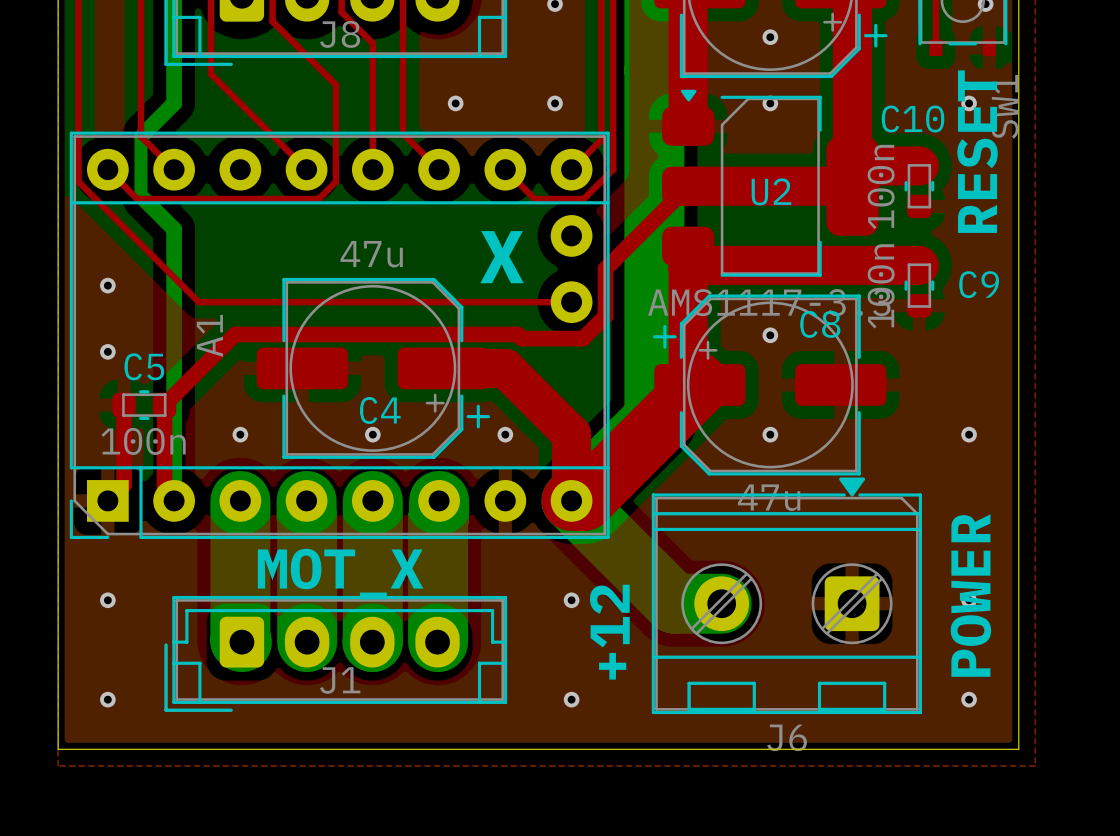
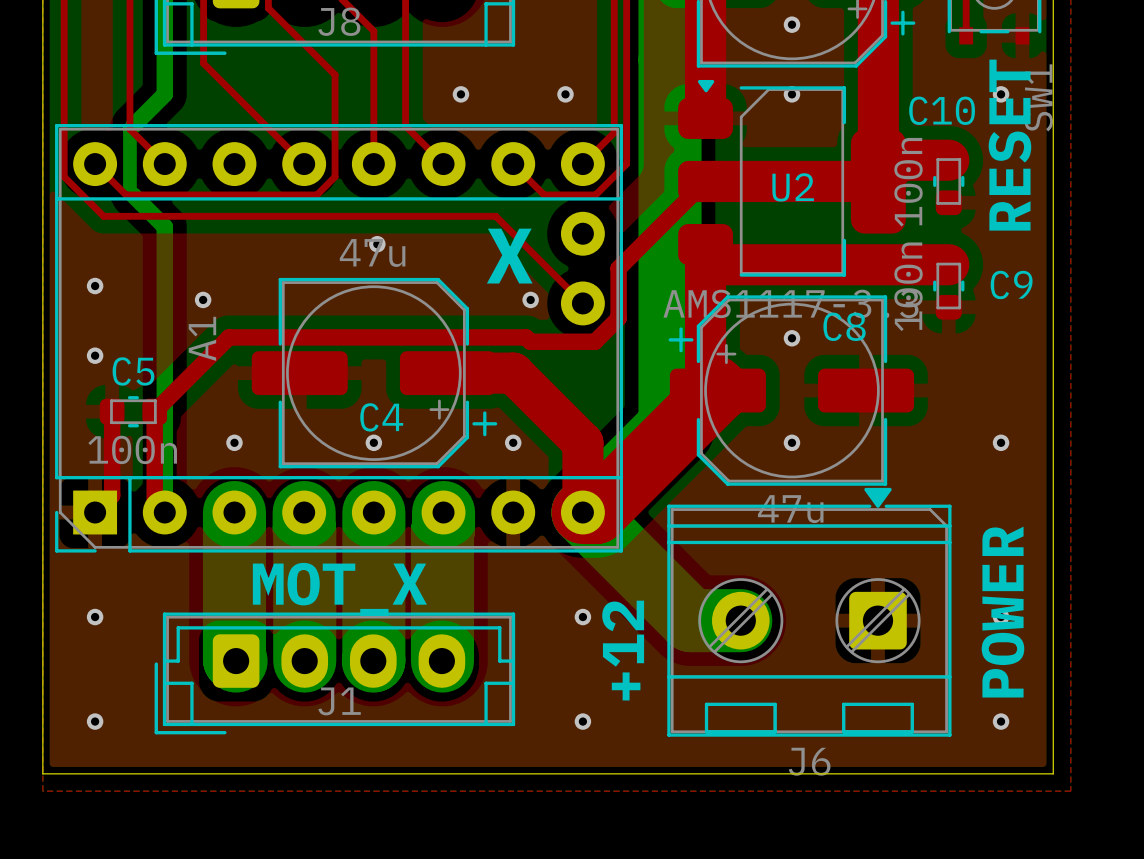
top track: (116, 219) (198, 302) (571, 302) -> (103, 216) (495, 216) (582, 303)
via: none -> (377, 244)
via: none -> (203, 299)
via: none -> (530, 299)

